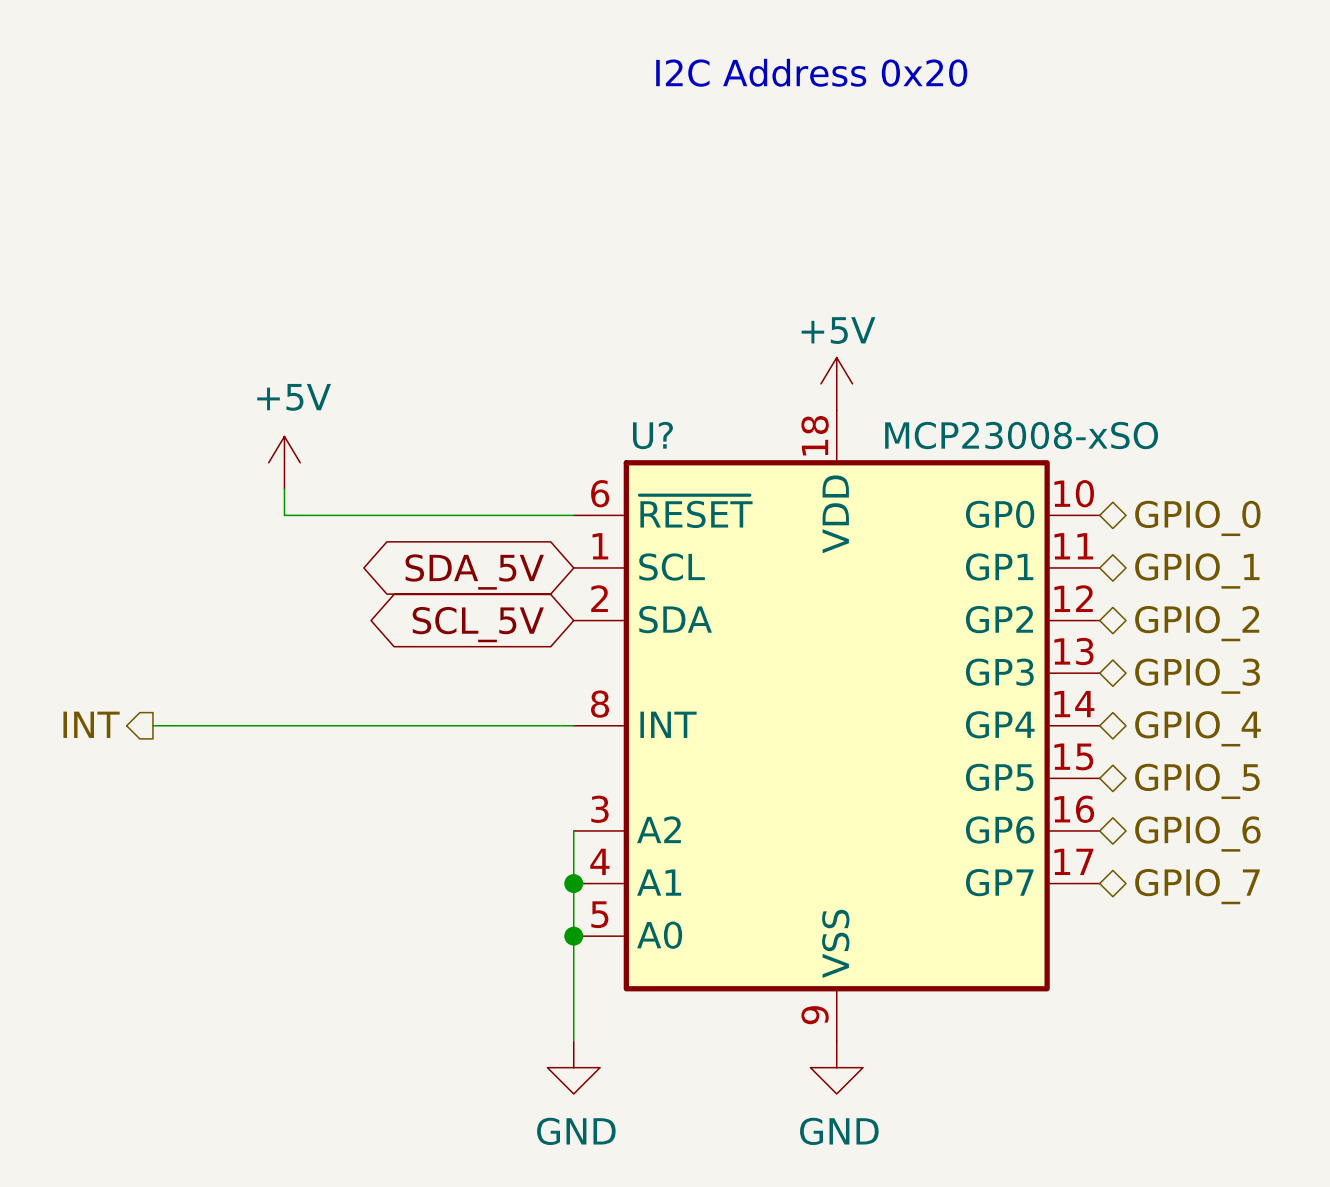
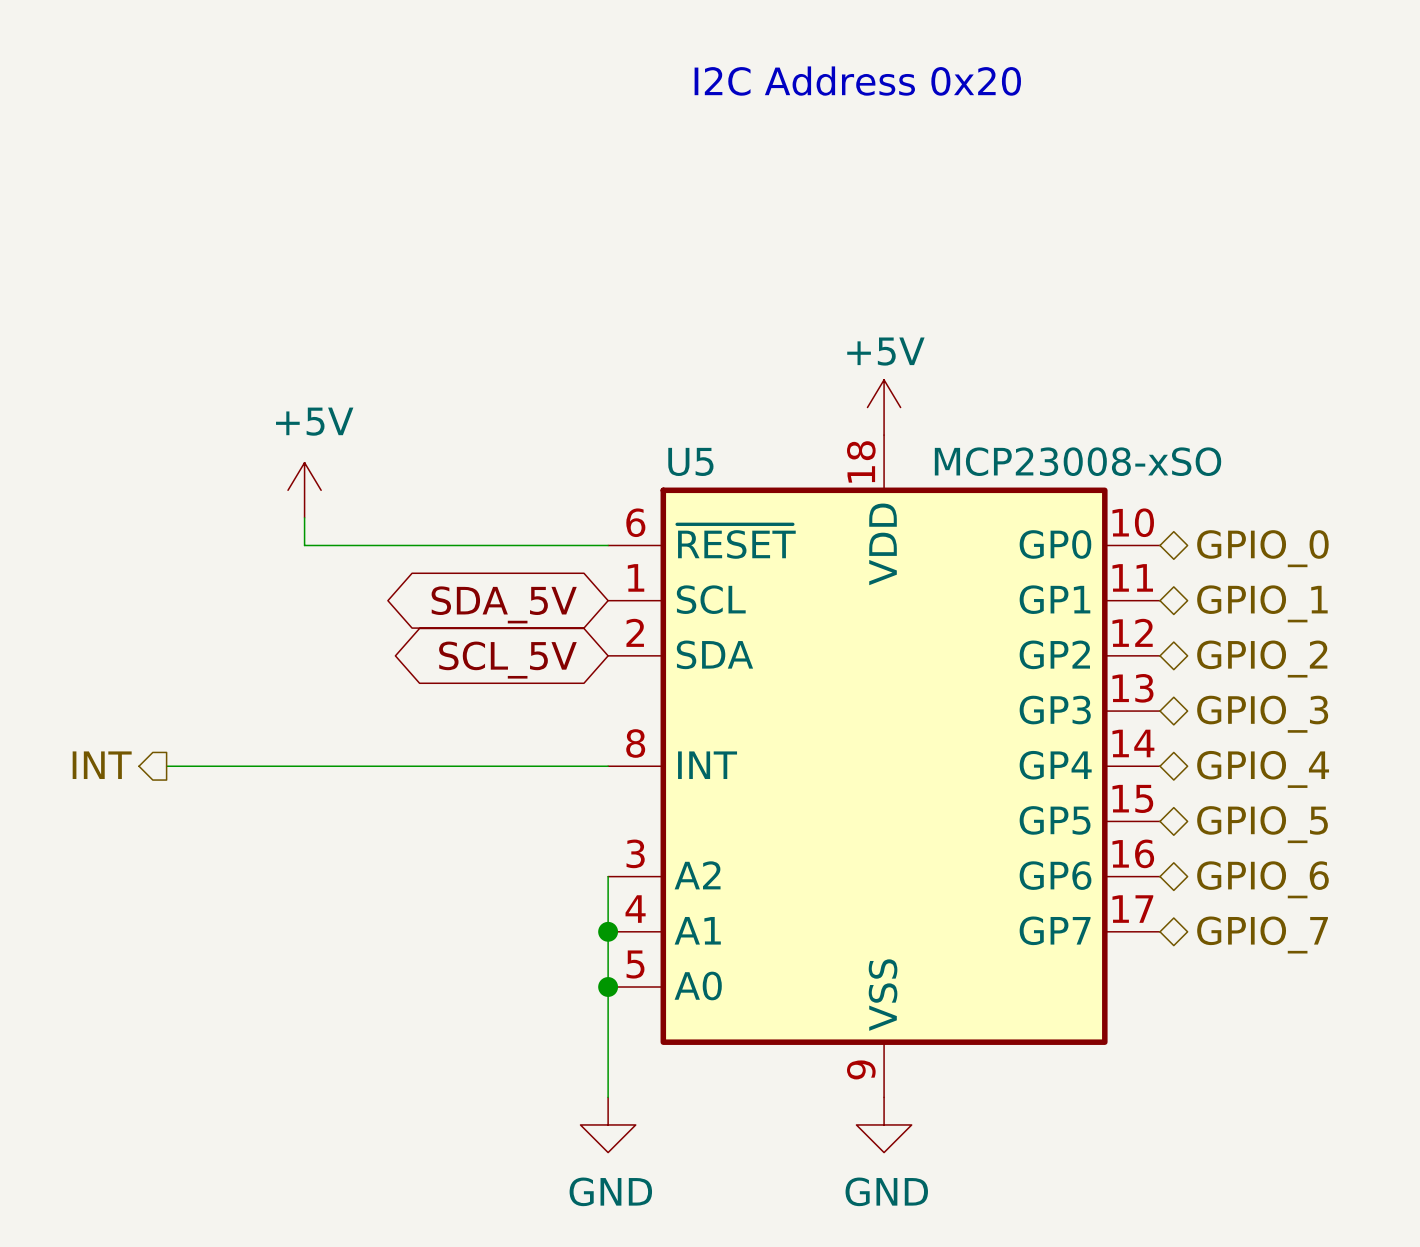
U? name: U? (652, 435) -> U5 (690, 461)

